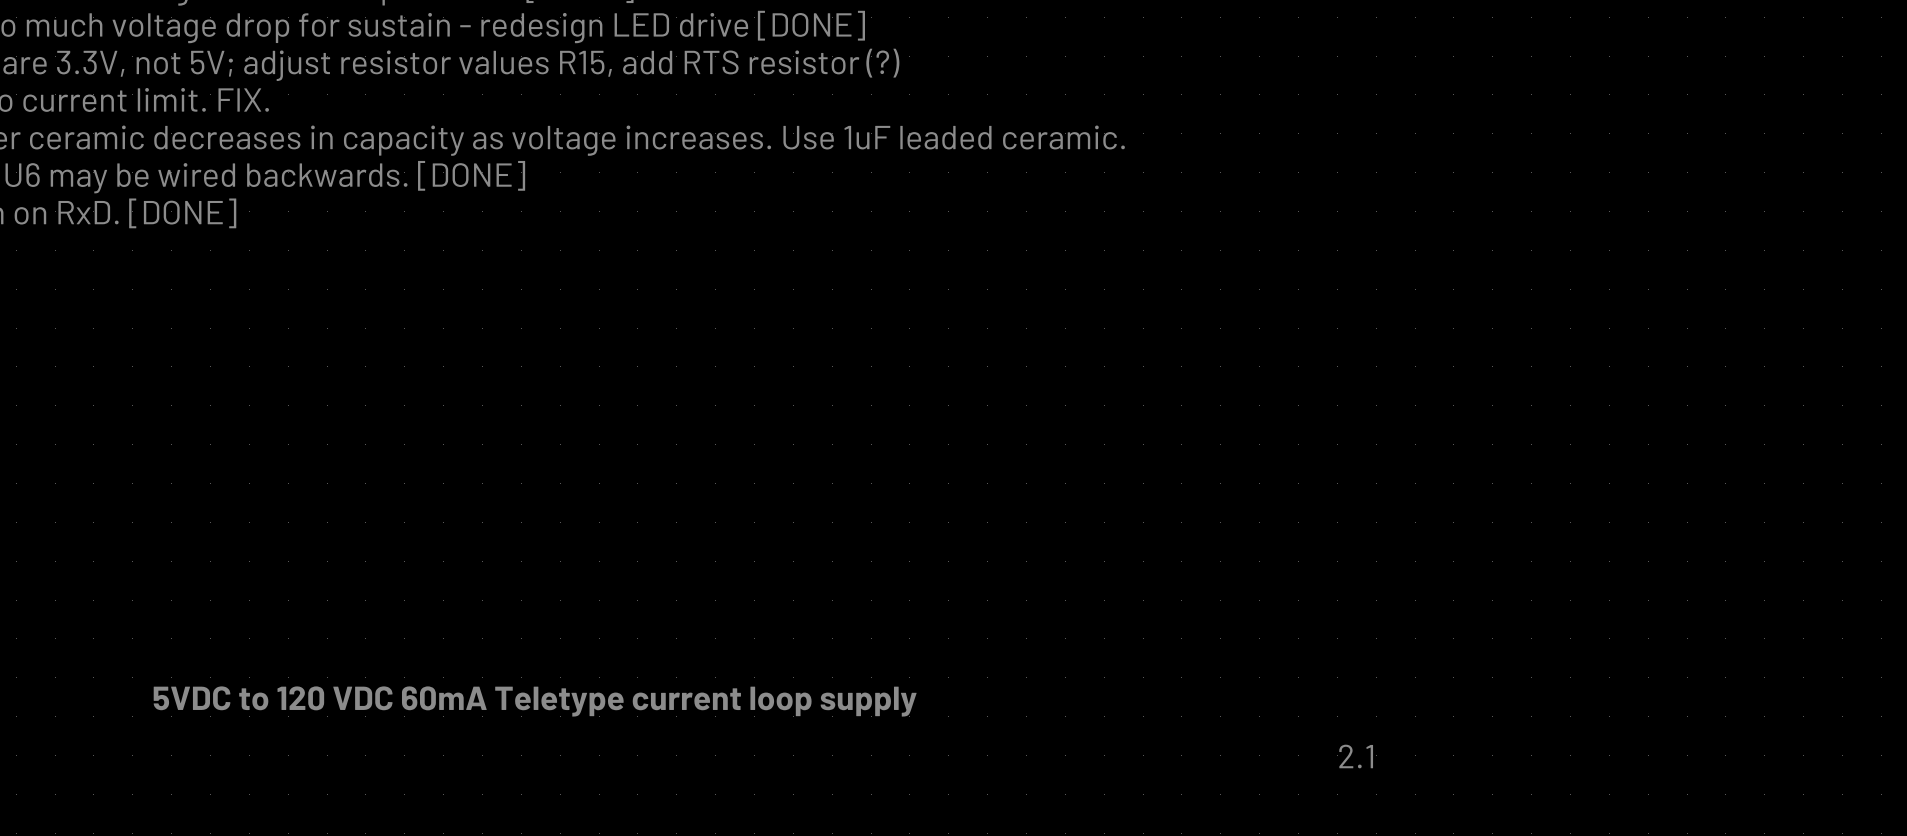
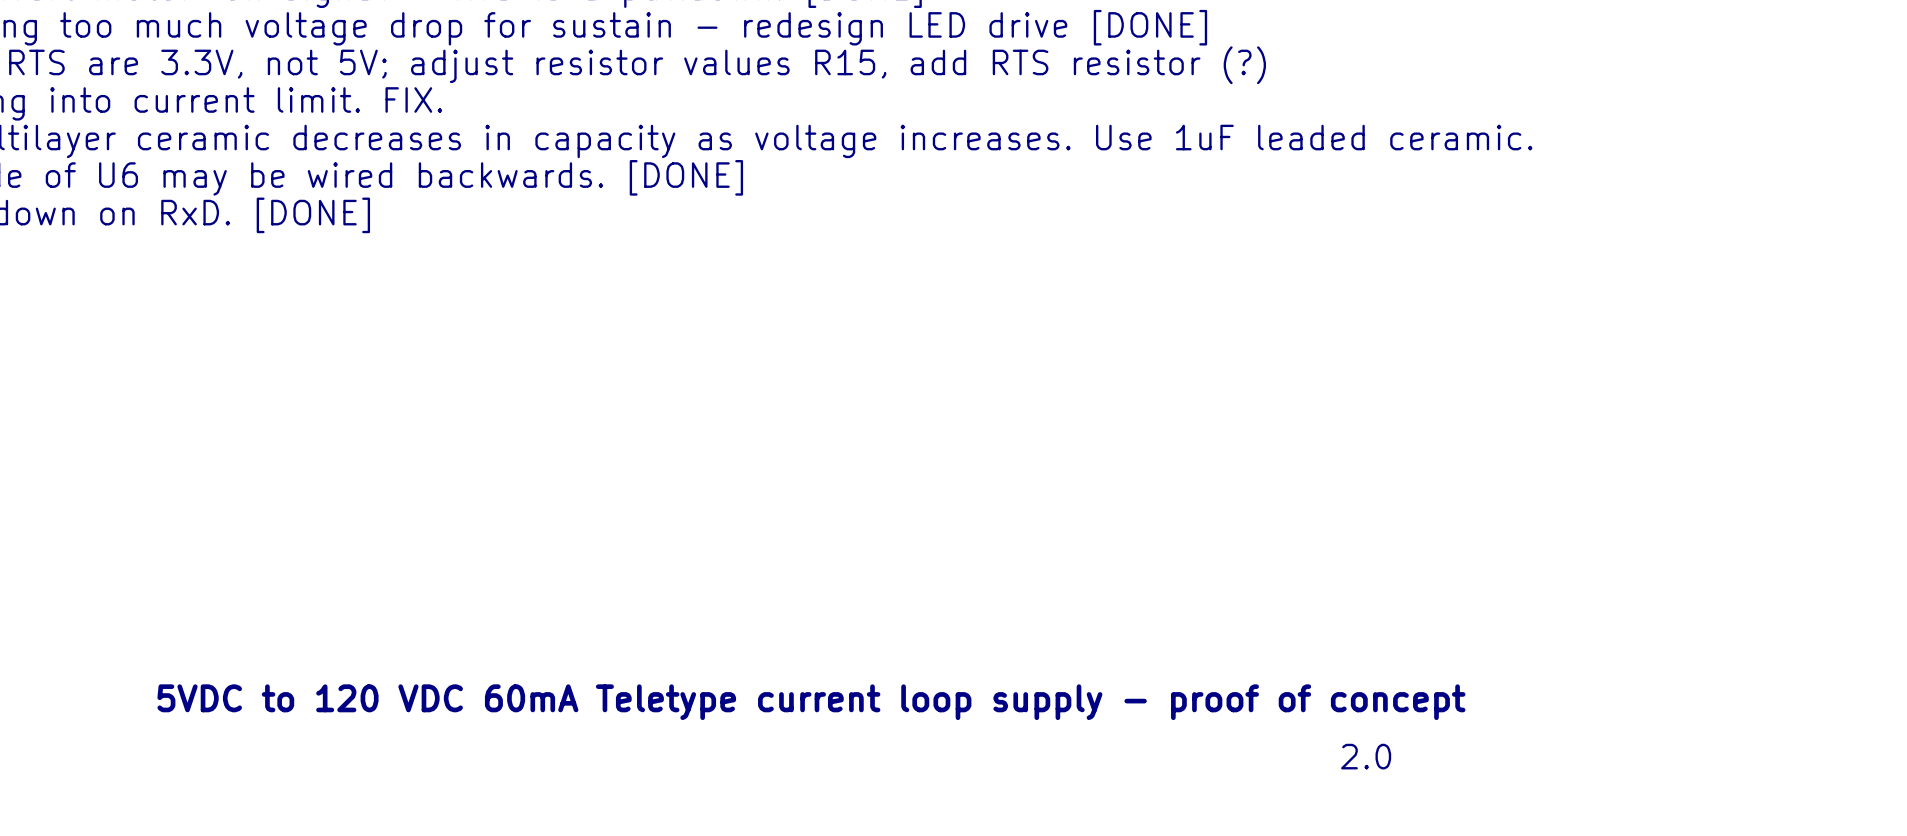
text: 5VDC to 120 VDC 60mA Teletype current loop supply (535, 701) -> 5VDC to 120 VDC 60mA Teletype current loop supply - proof of concept (811, 702)
text: 2.1 (1356, 756) -> 2.0 (1366, 756)

